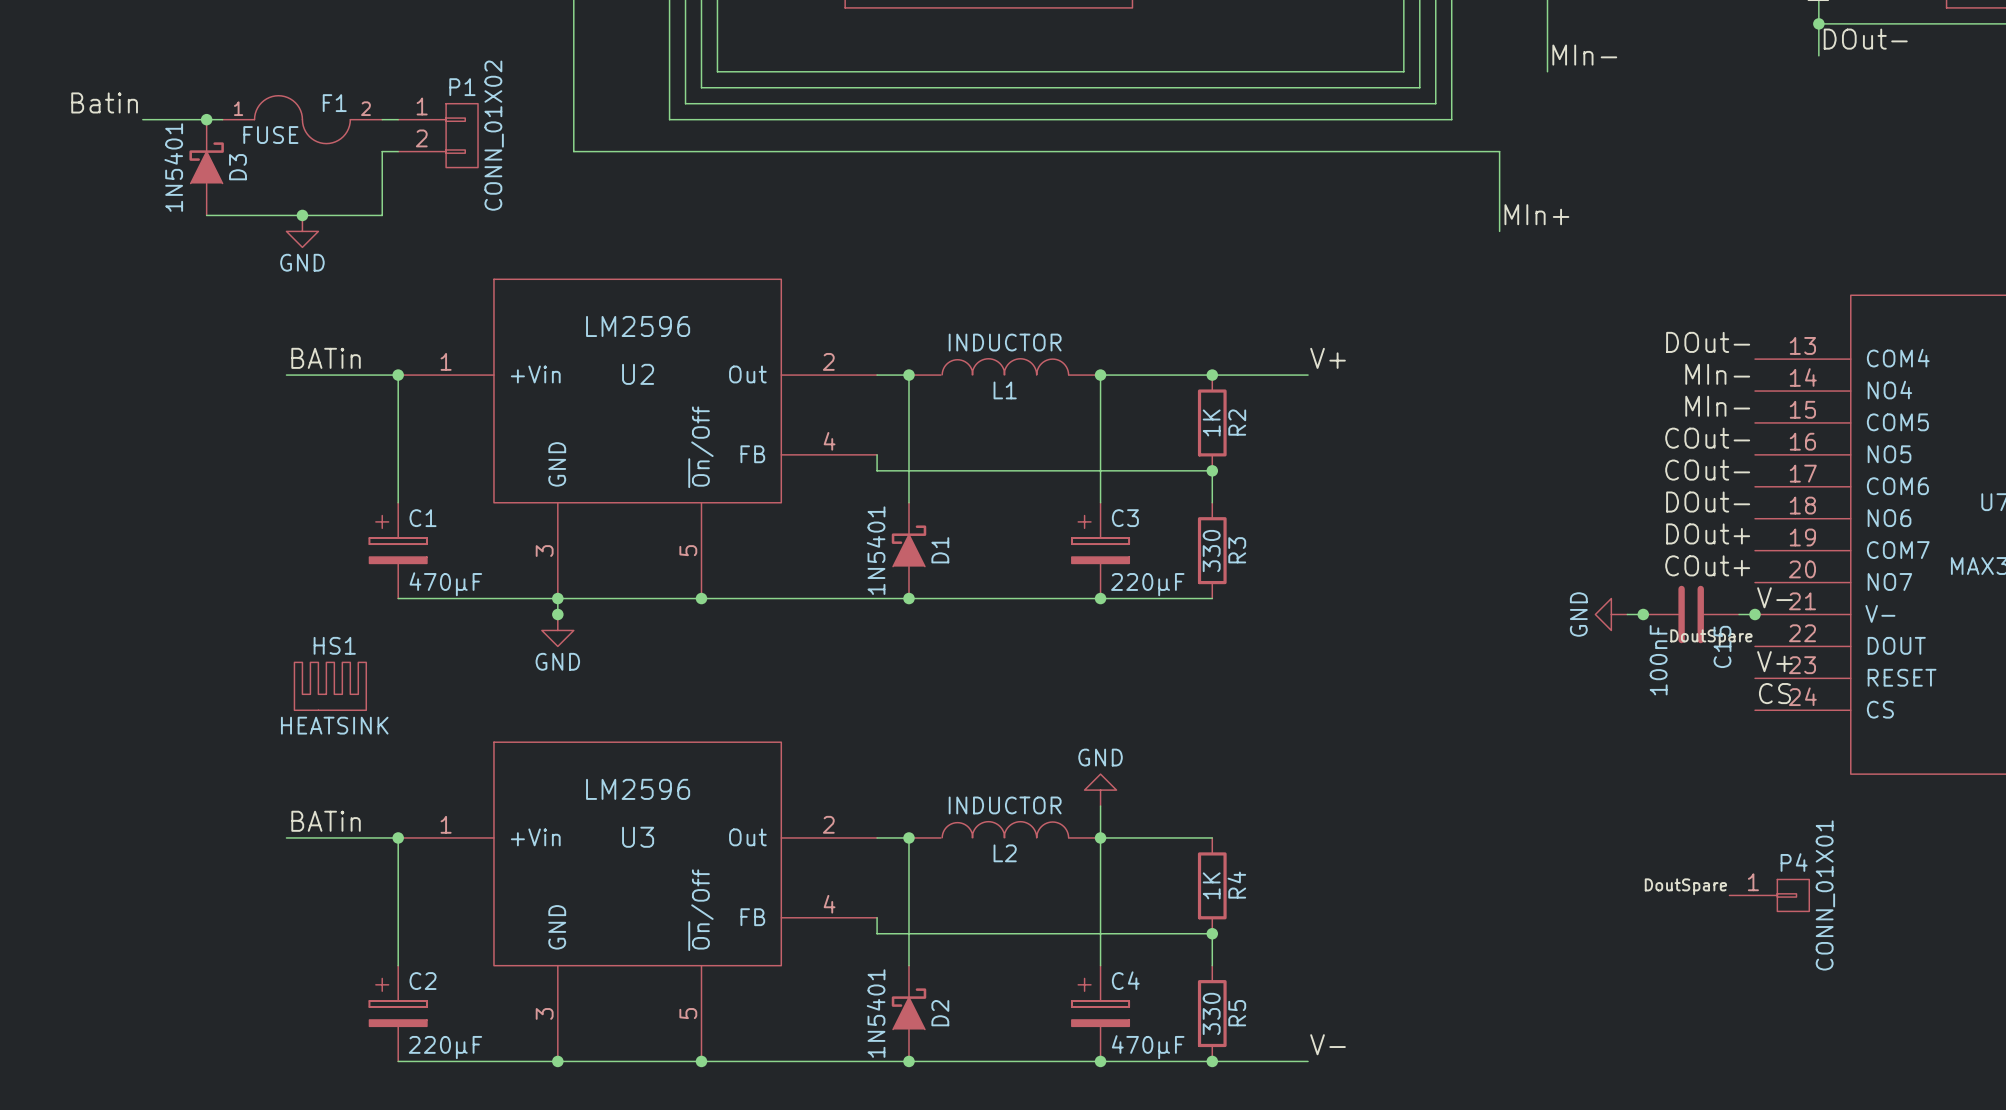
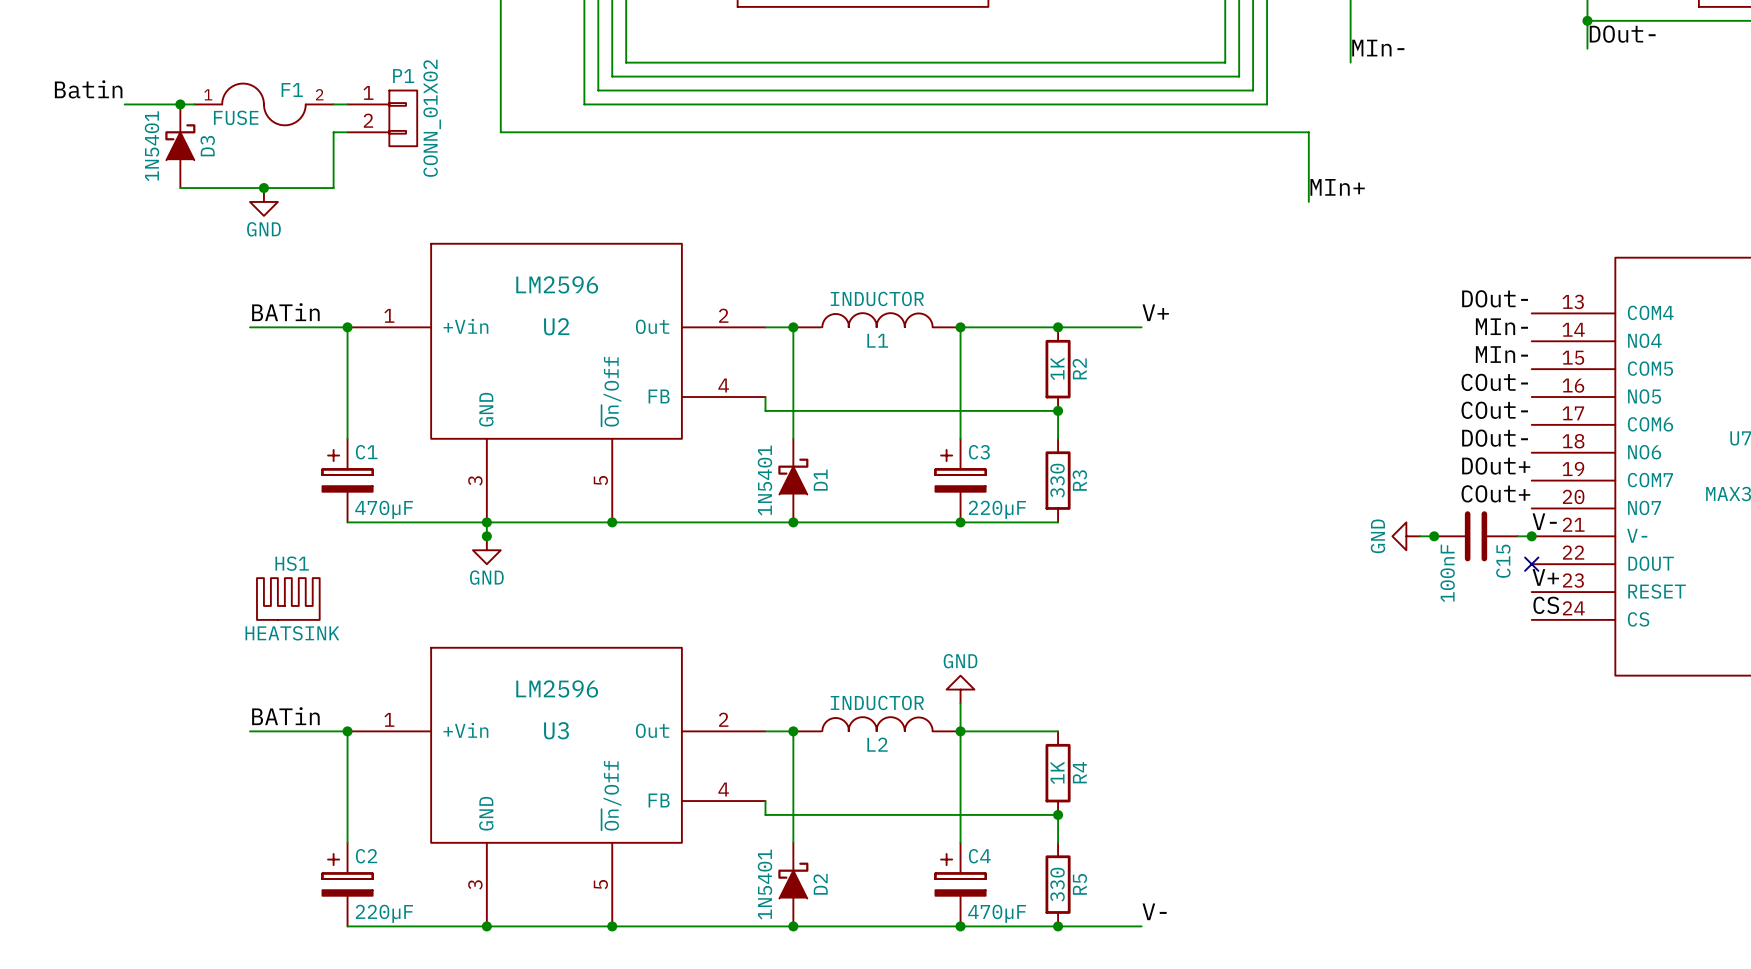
label: DoutSpare (1711, 637) -> none
no-connect mark: none -> (1531, 564)
label: DoutSpare (1685, 886) -> none
P4: CONN_01X01 (1769, 895) -> none

